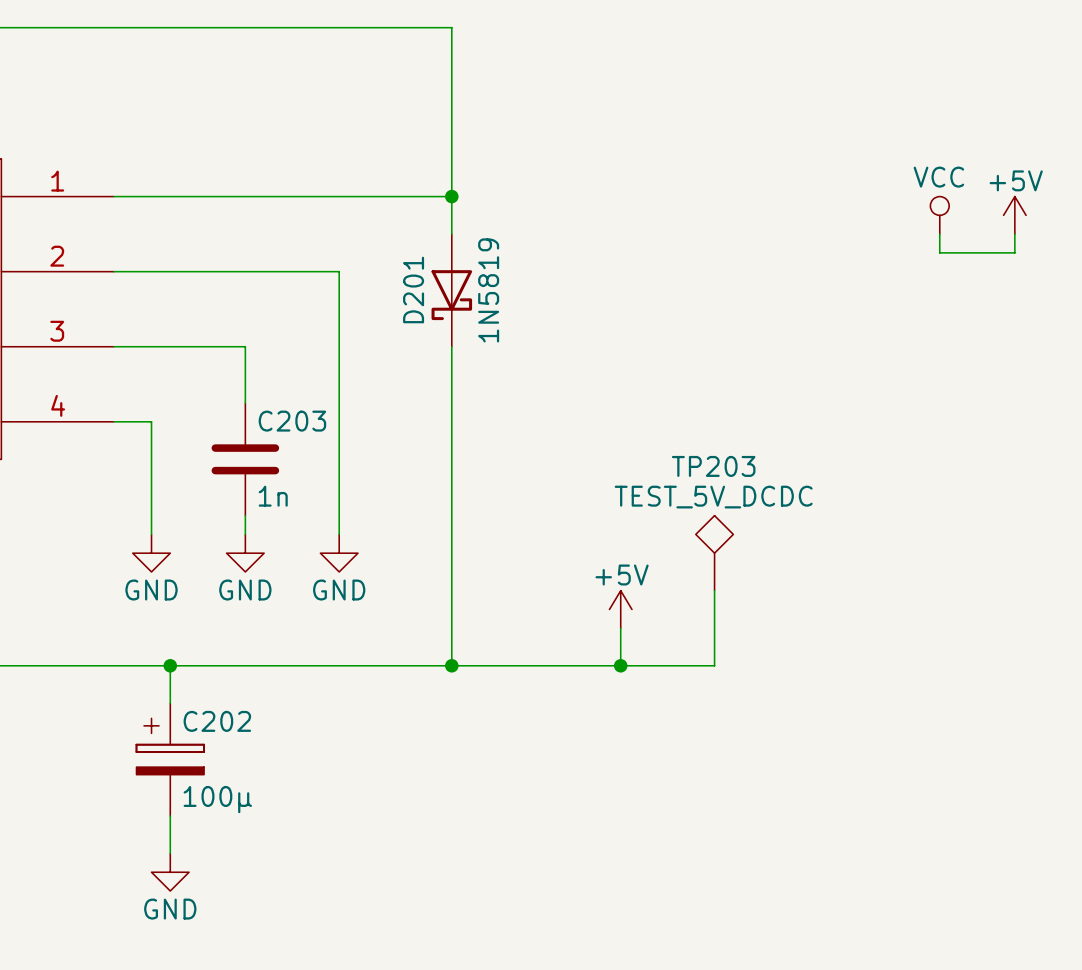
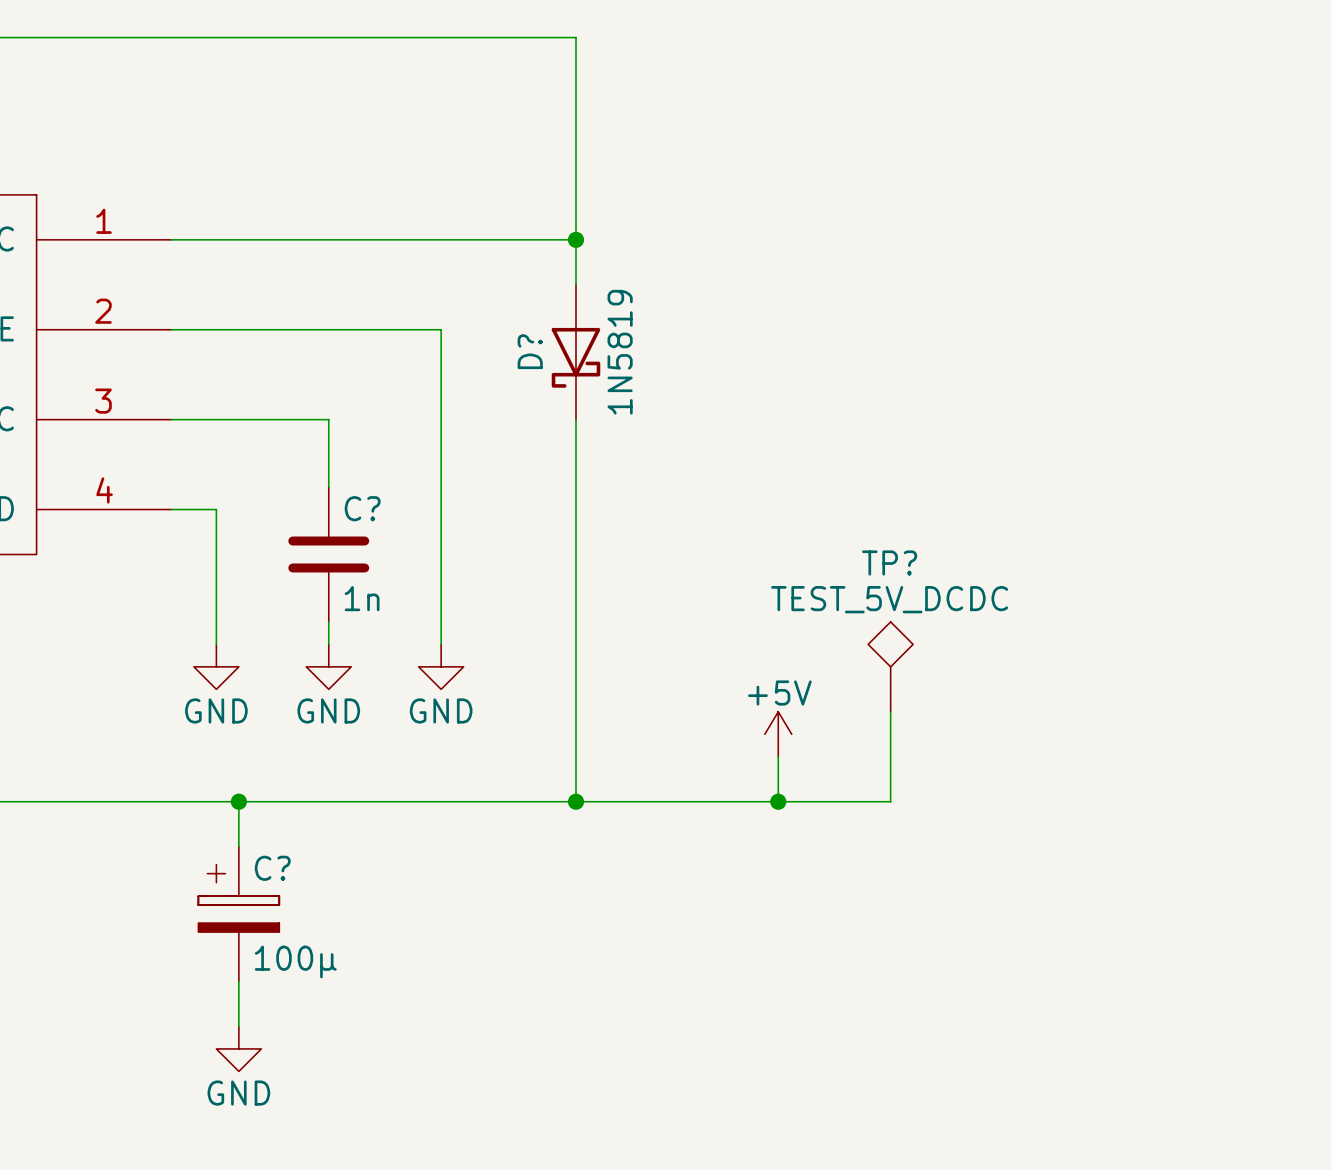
power symbol: VCC (939, 215) -> none
power symbol: +5V (1014, 215) -> none
wire: (939, 234) (939, 252) (1014, 252) (1014, 234) -> none
D201 name: D201 (413, 289) -> D? (530, 351)
C203 name: C203 (292, 421) -> C? (362, 508)
TP203 name: TP203 (713, 466) -> TP? (889, 562)
C202 name: C202 (217, 721) -> C? (272, 868)

